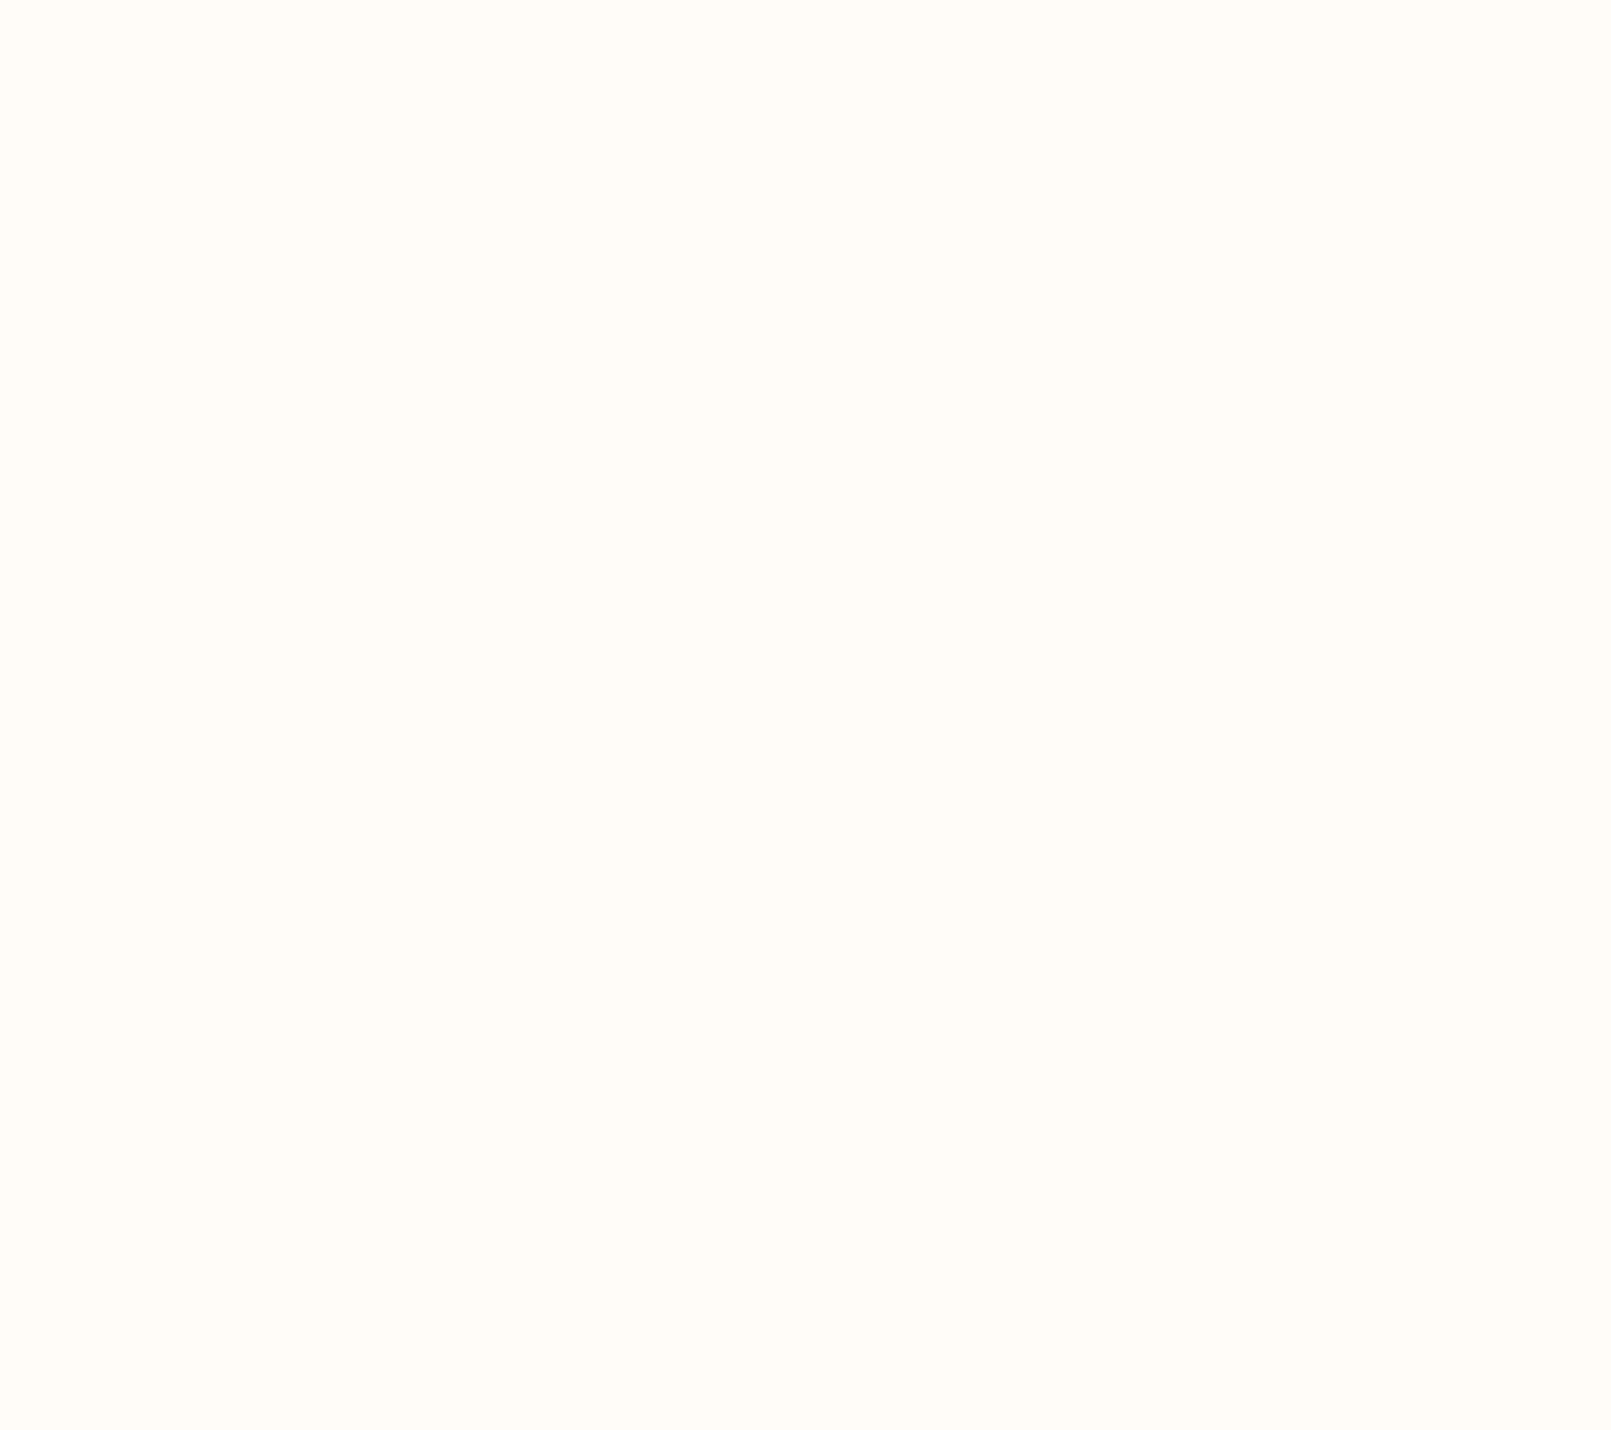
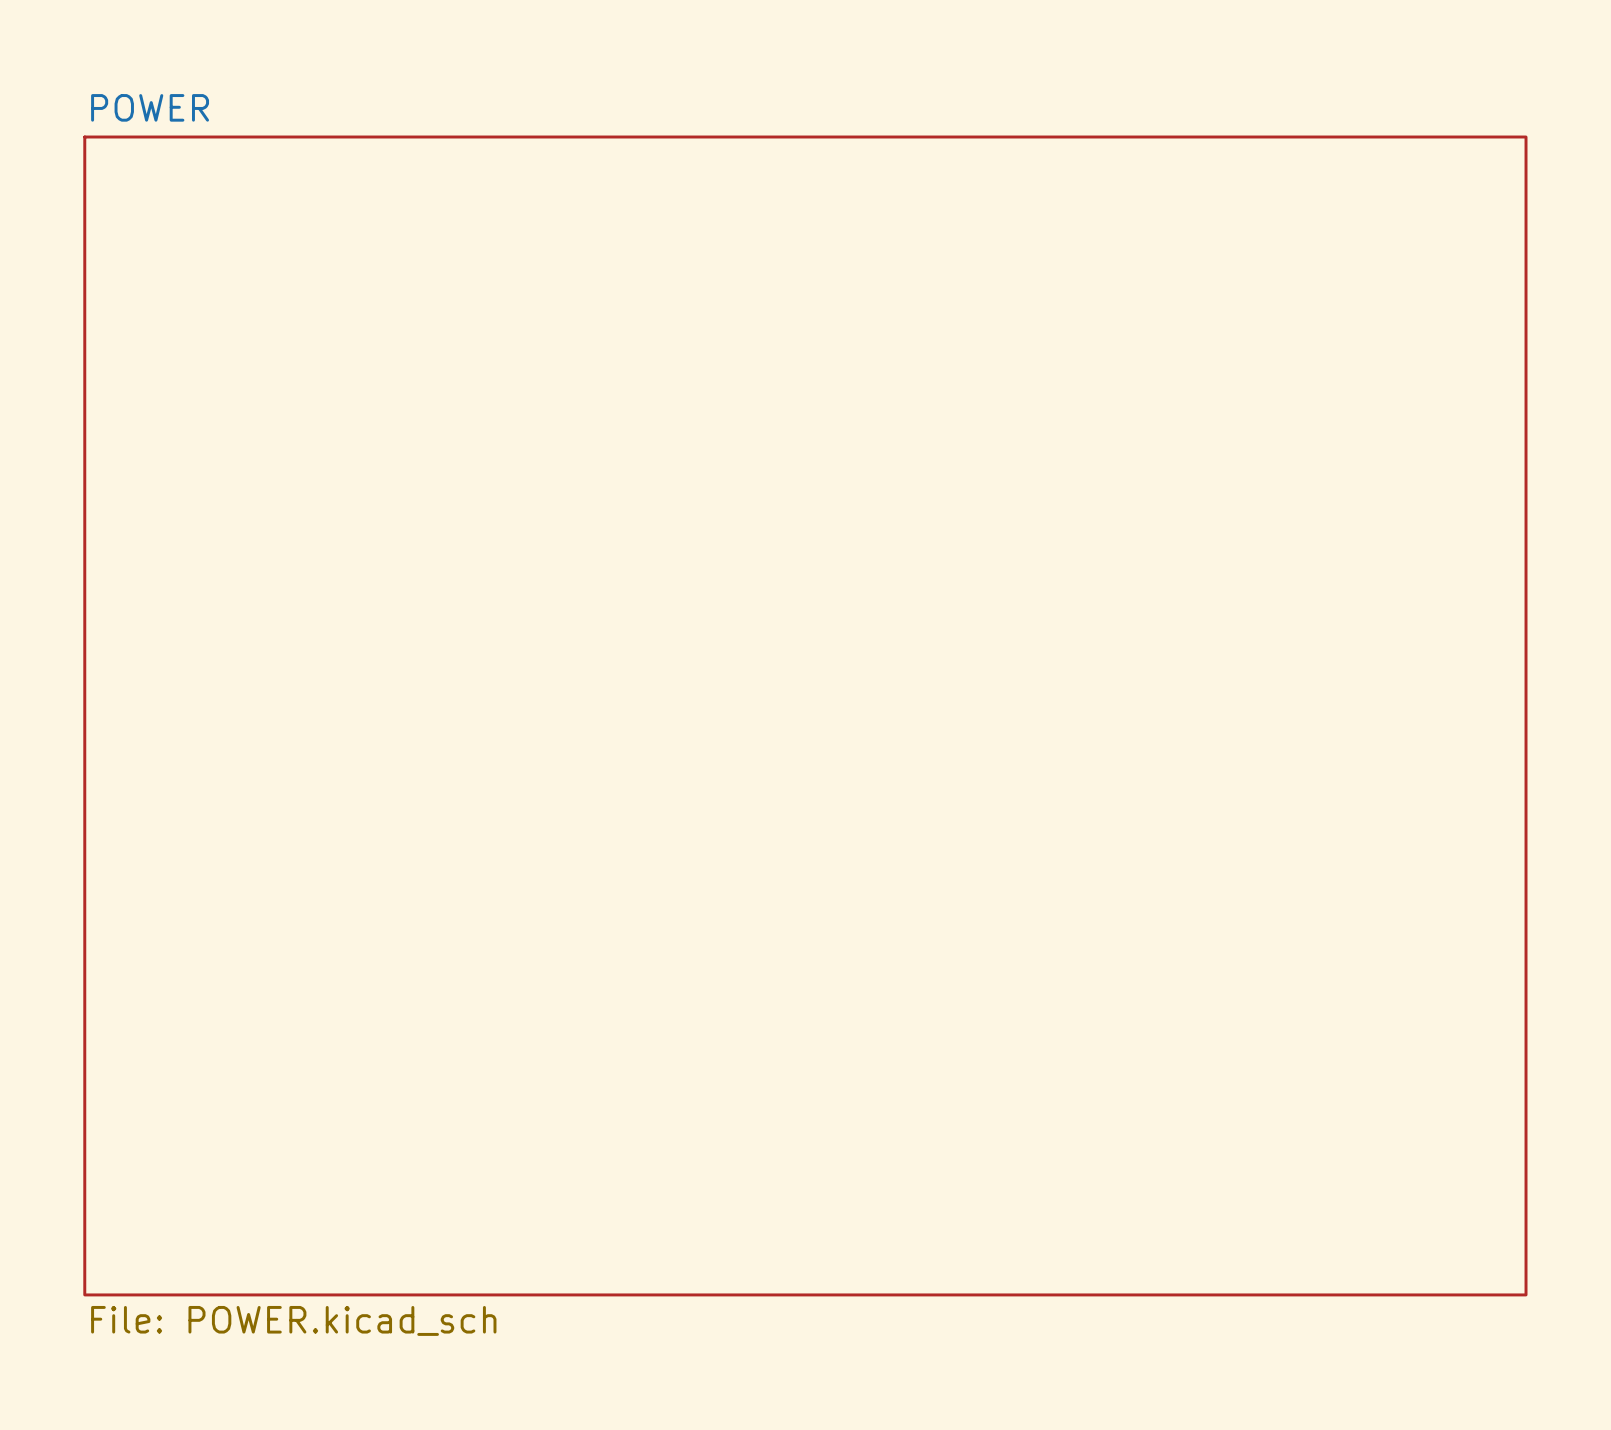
sheet POWER: none -> File: POWER.kicad_sch (805, 715)

